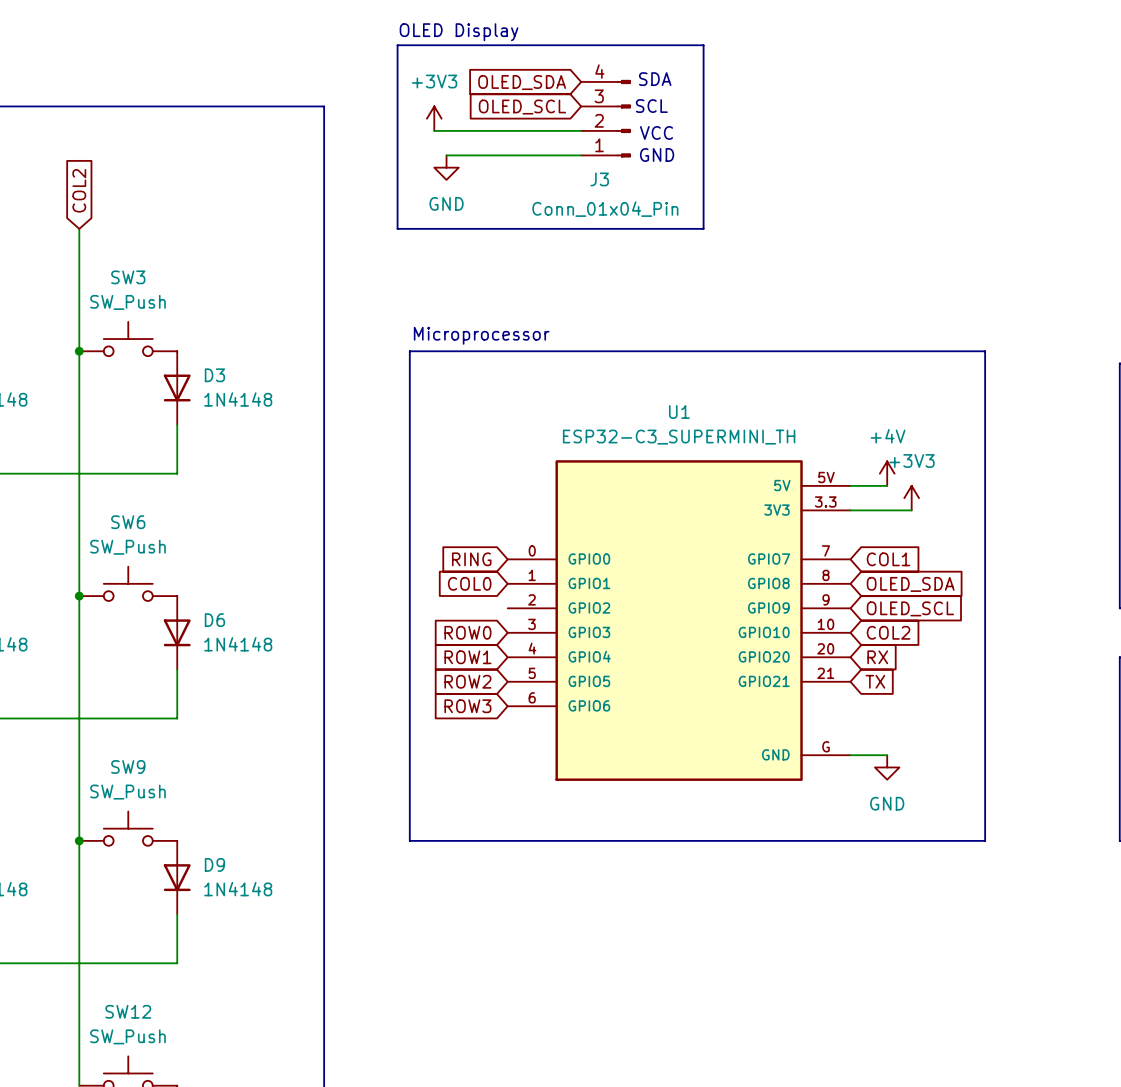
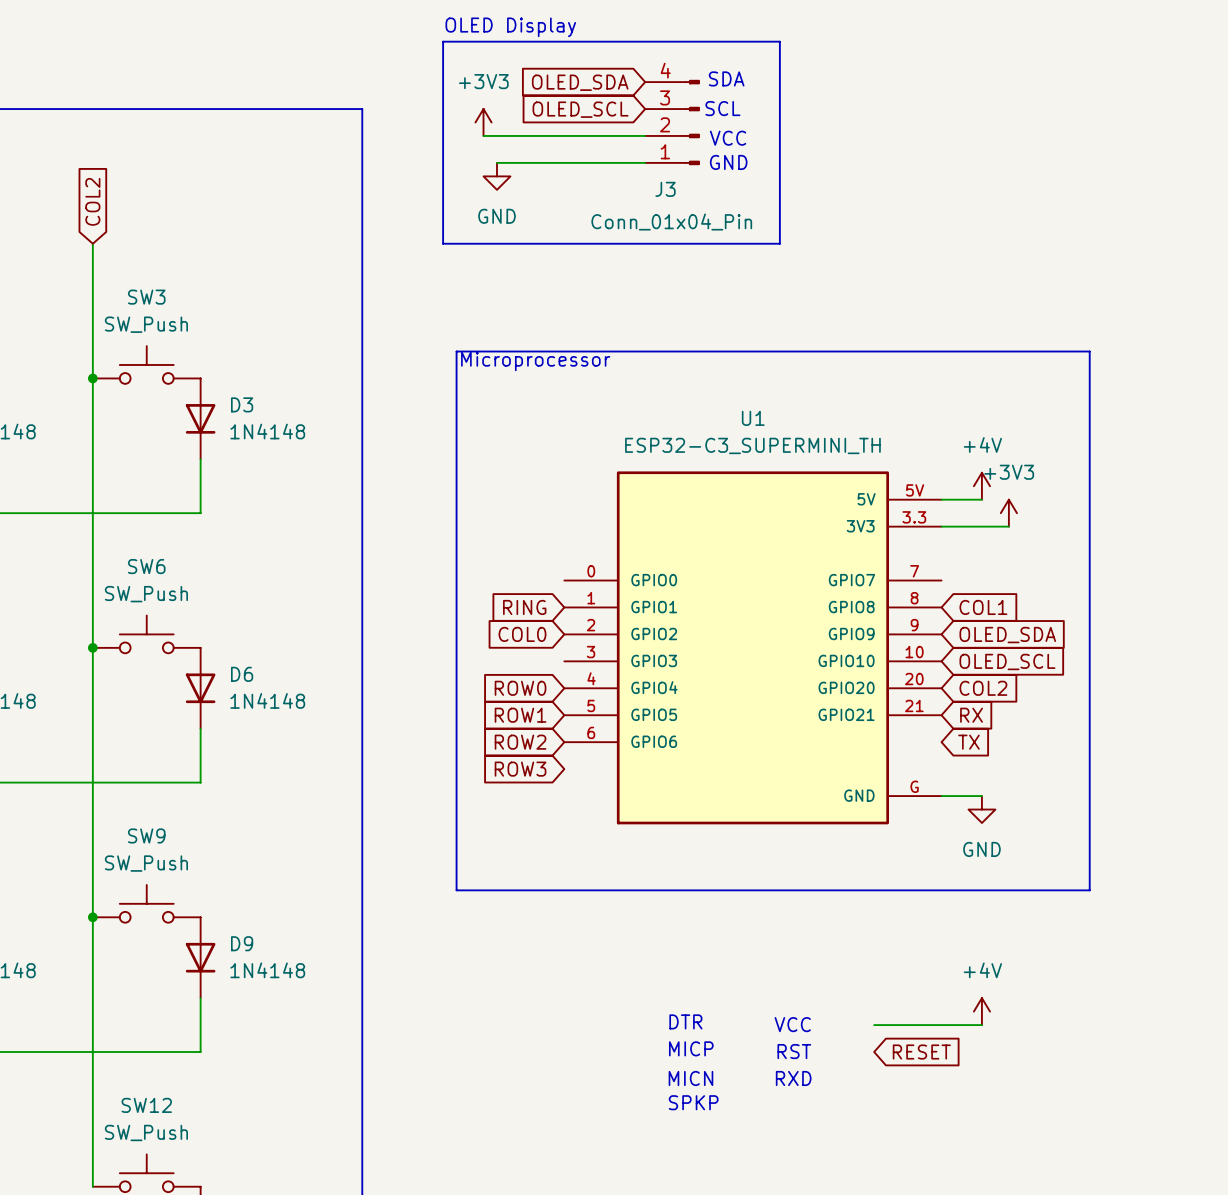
line: (409, 351) (985, 351) -> (456, 378) (456, 351) (1089, 351) (1089, 378)
wire: none -> (941, 499) (981, 499)
power symbol position: +4V (887, 473) -> +4V (981, 486)
wire: none -> (981, 526) (1008, 526)
power symbol position: +3V3 (911, 498) -> +3V3 (1008, 513)
wire: (850, 510) (911, 510) -> none
U1 position: (679, 620) -> (752, 647)
wire: (850, 755) (887, 755) -> (941, 796) (981, 796)
power symbol position: GND (887, 767) -> GND (981, 809)
line: (409, 816) (409, 840) (985, 840) (985, 816) -> (456, 890) (1089, 890)
power symbol: none -> +4V (981, 1011)
text: none -> DTR (685, 1021)
text: none -> VCC (792, 1024)
wire: none -> (874, 1025) (981, 1025)
text: none -> MICP (691, 1048)
text: none -> RST (794, 1051)
global label: none -> RESET (921, 1052)
text: none -> MICN (690, 1078)
text: none -> RXD (793, 1078)
text: none -> SPKP (693, 1102)

